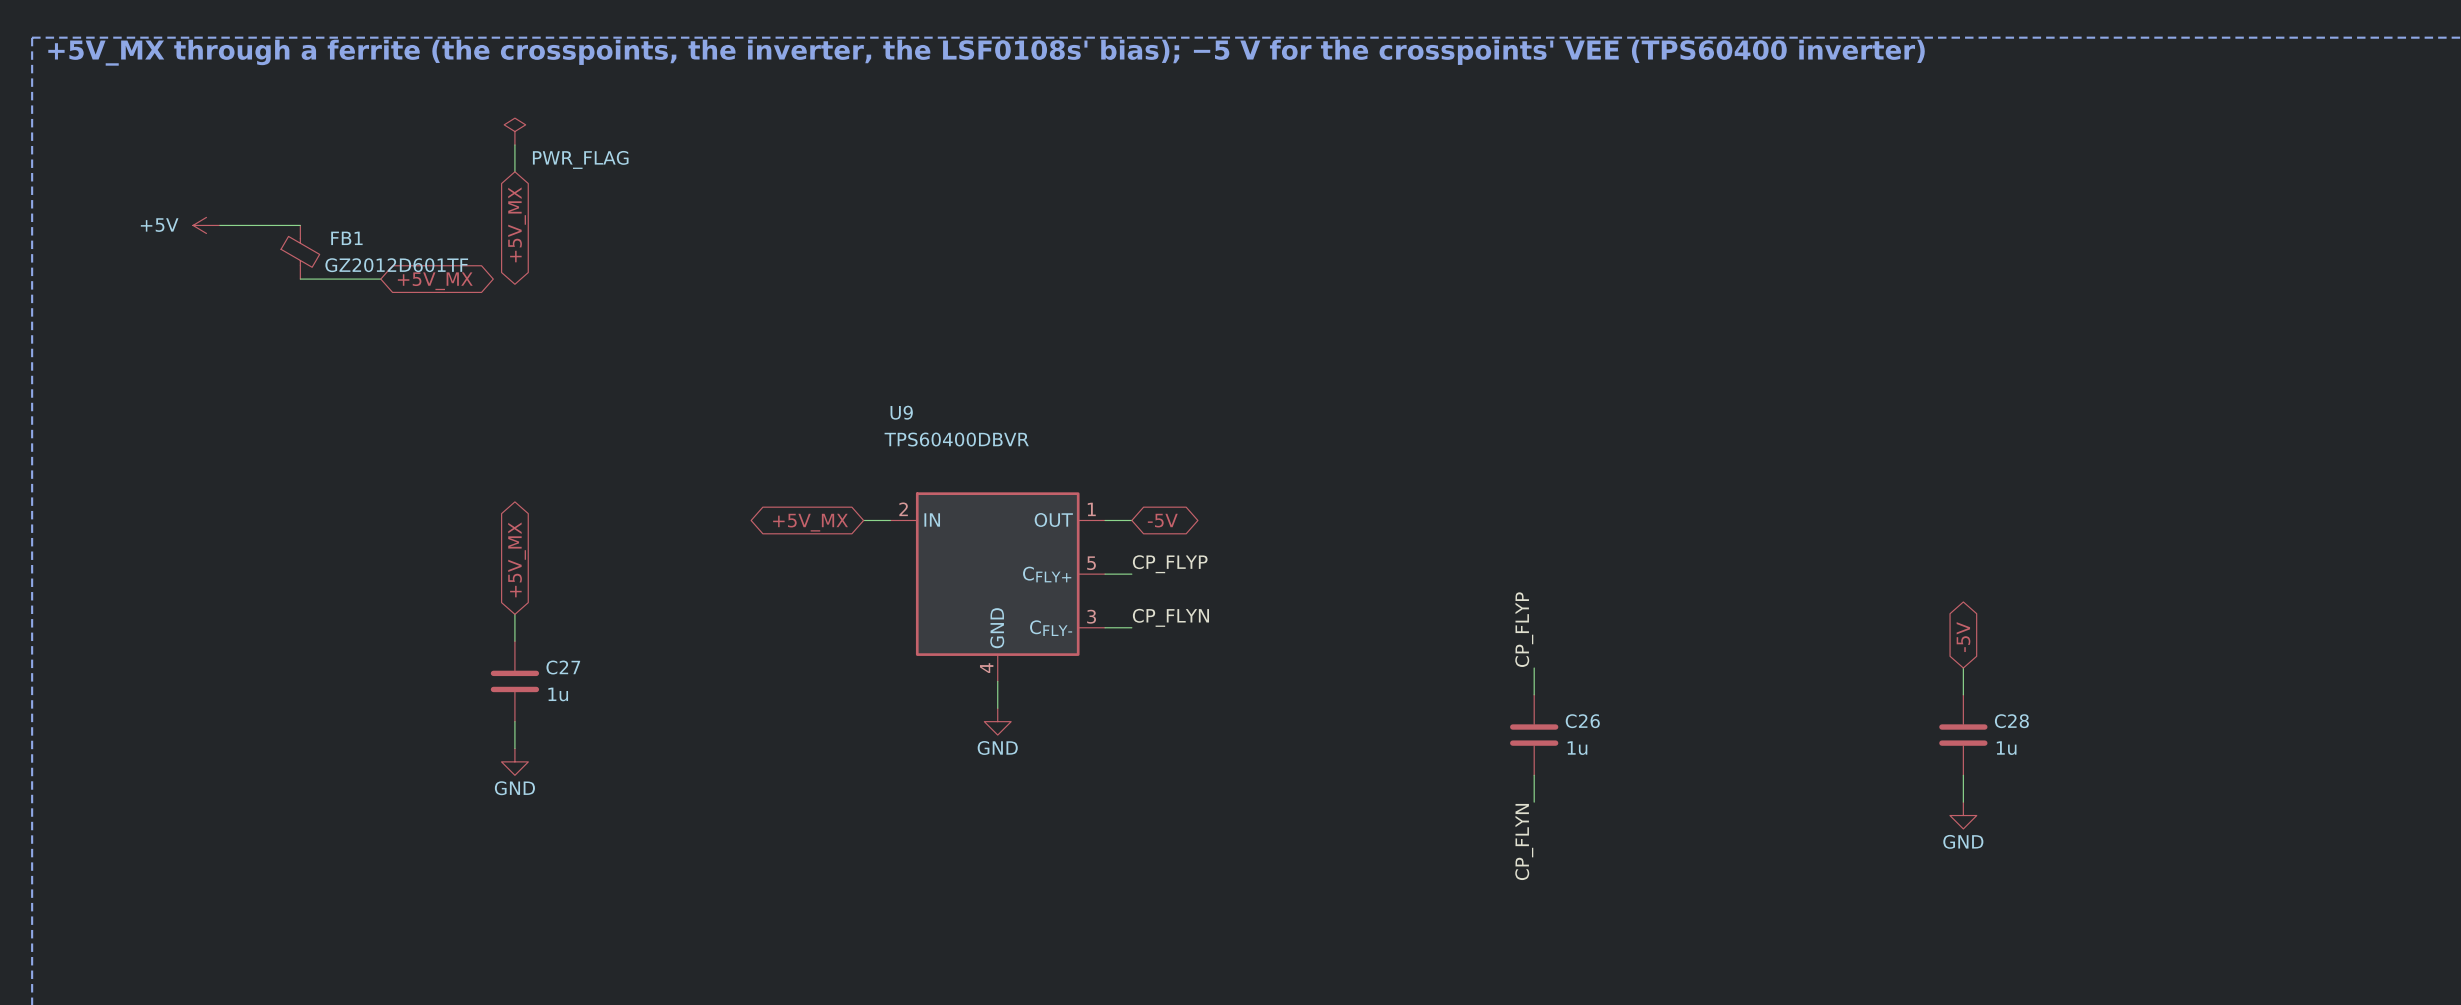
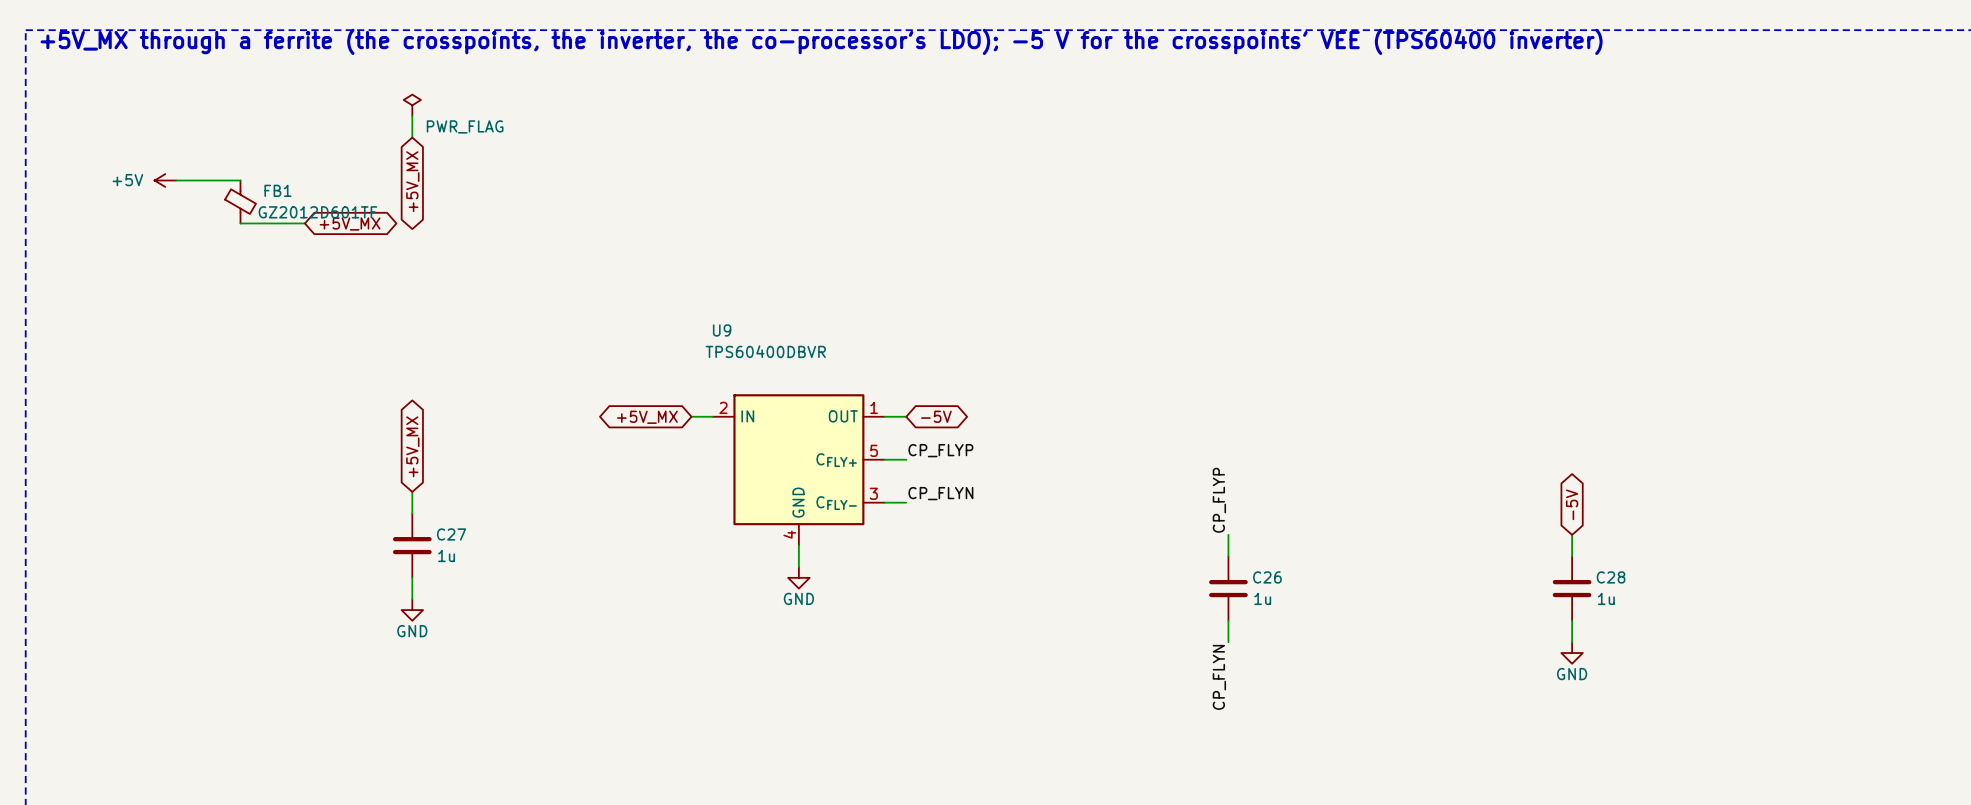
text: +5V_MX through a ferrite (the crosspoints, the inverter, the LSF0108s' bias); −5 V for the crosspoints' VEE (TPS60400 inverter) (986, 52) -> +5V_MX through a ferrite (the crosspoints, the inverter, the co-processor's LDO); −5 V for the crosspoints' VEE (TPS60400 inverter) (821, 41)

